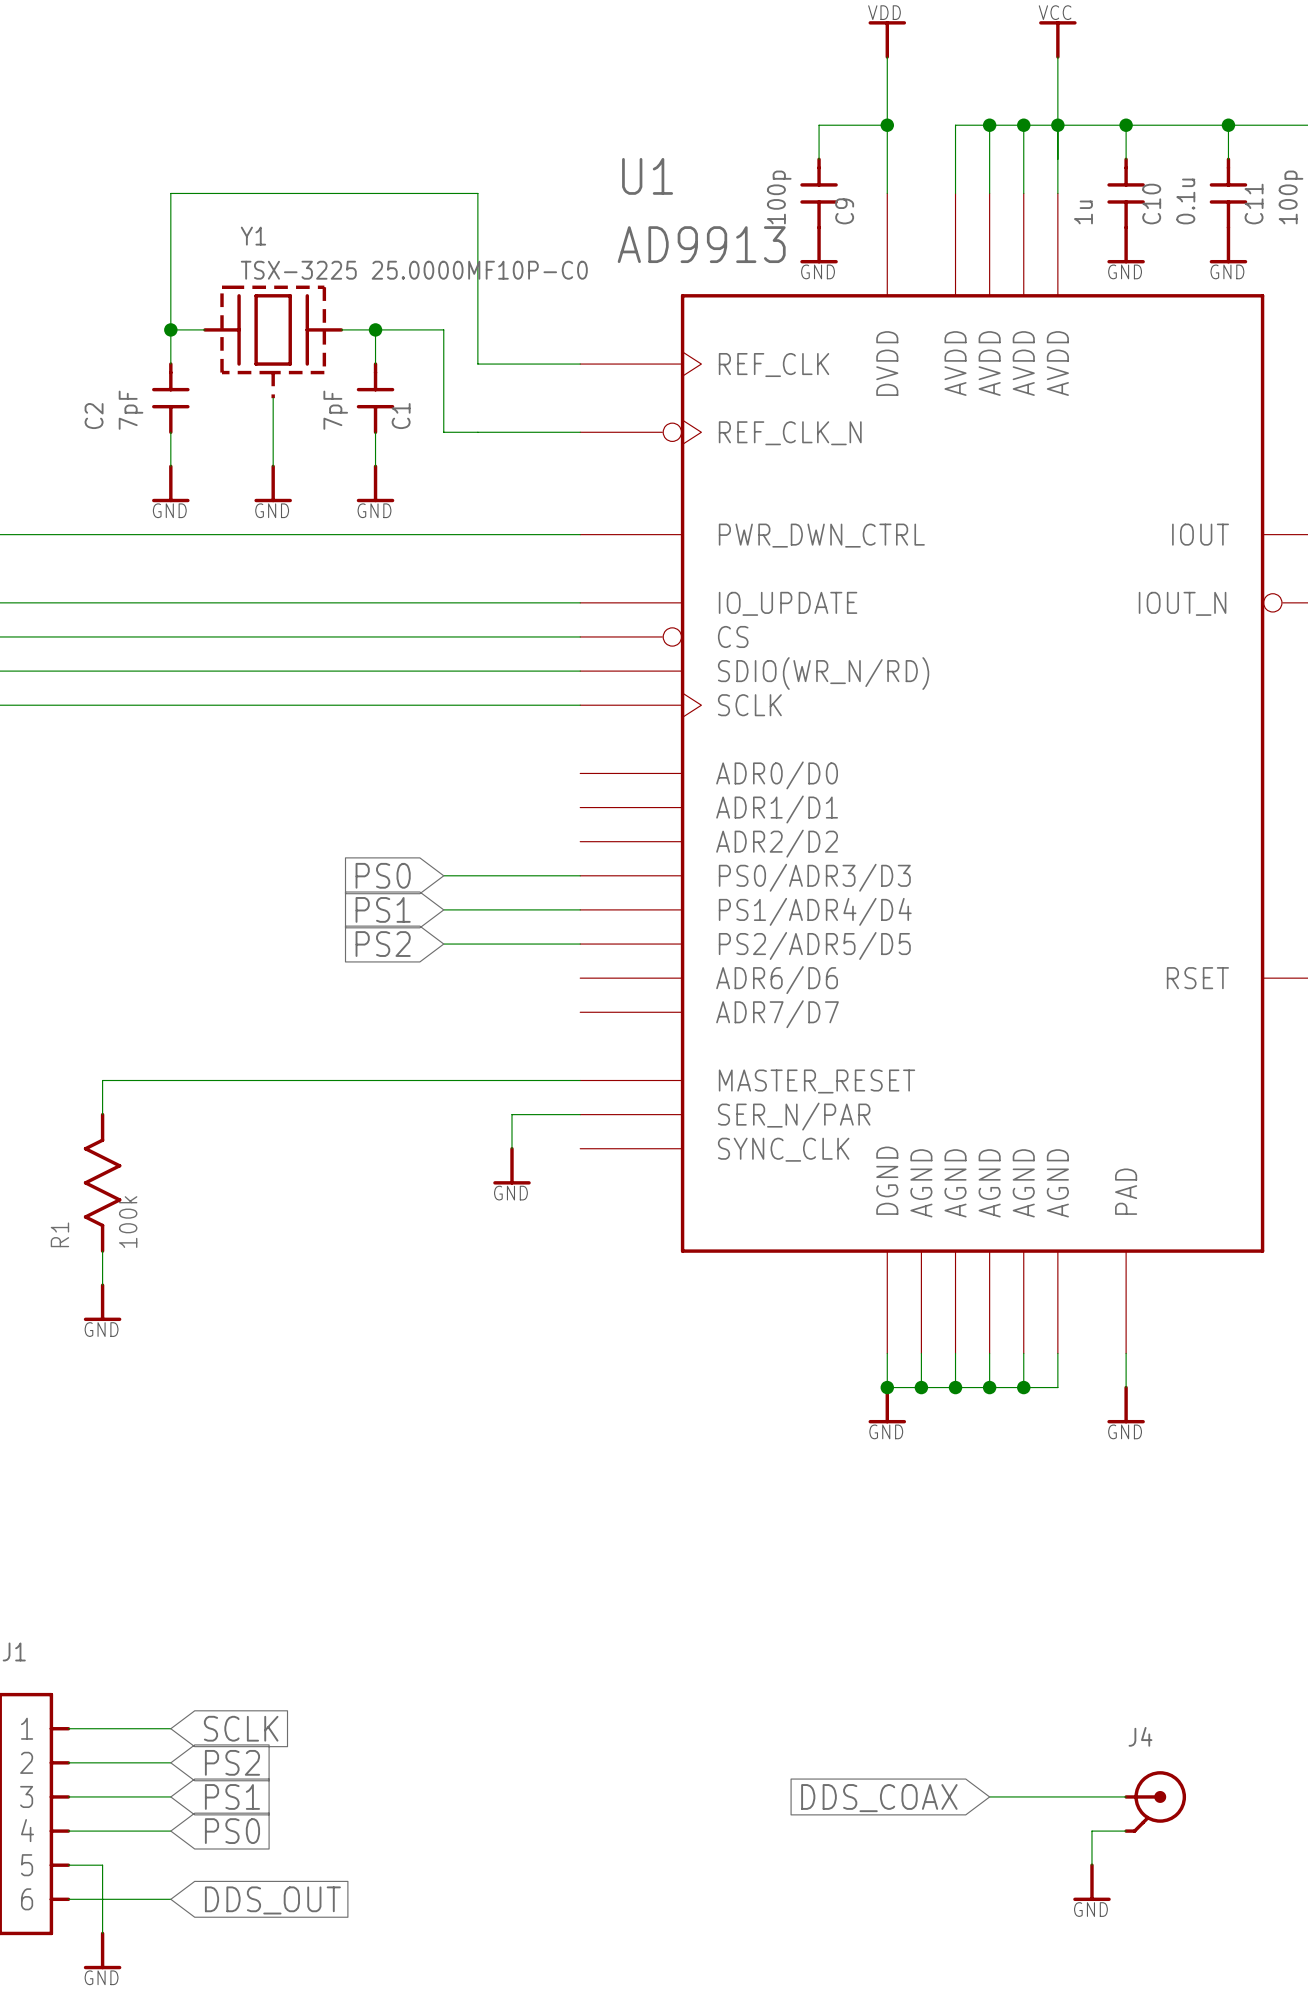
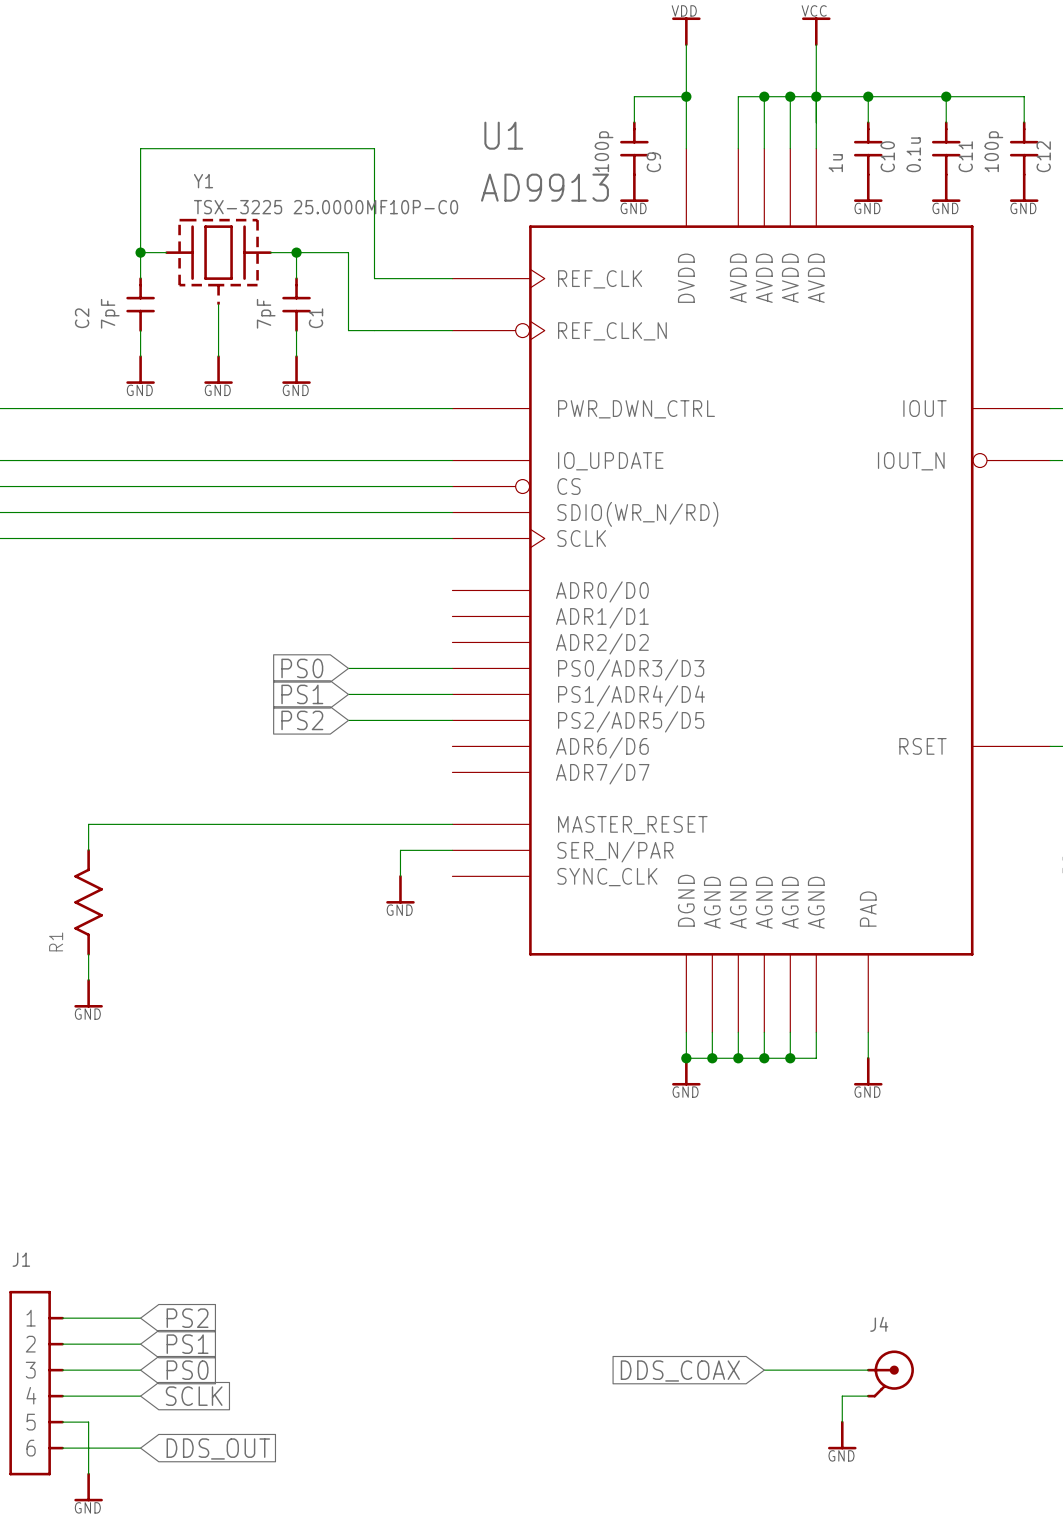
R1 value: 100k (128, 1222) -> none
global label: SCLK (241, 1728) -> PS2 (187, 1318)
global label: PS2 (232, 1762) -> PS1 (187, 1344)
global label: PS1 (232, 1796) -> PS0 (187, 1370)
global label: PS0 (232, 1831) -> SCLK (194, 1396)

